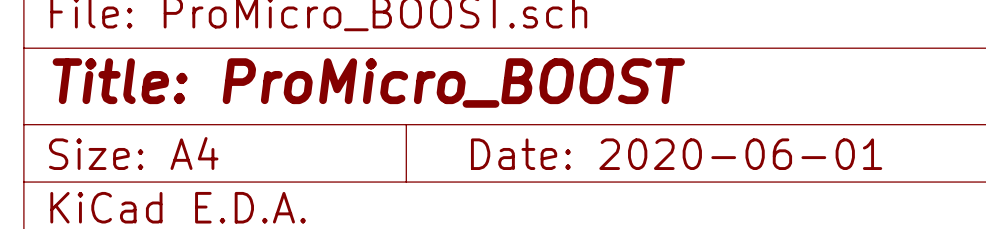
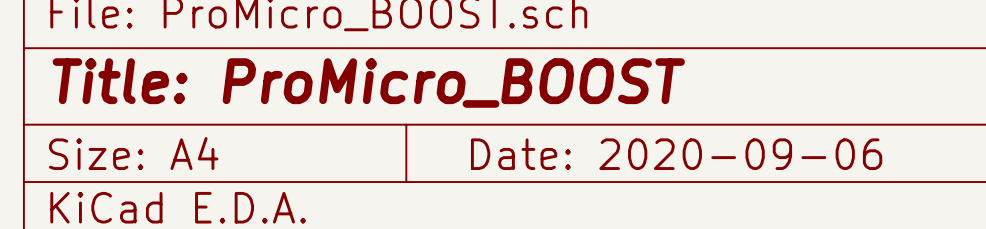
title block: Date: 2020-06-01 (676, 154) -> Date: 2020-09-06 (676, 154)

